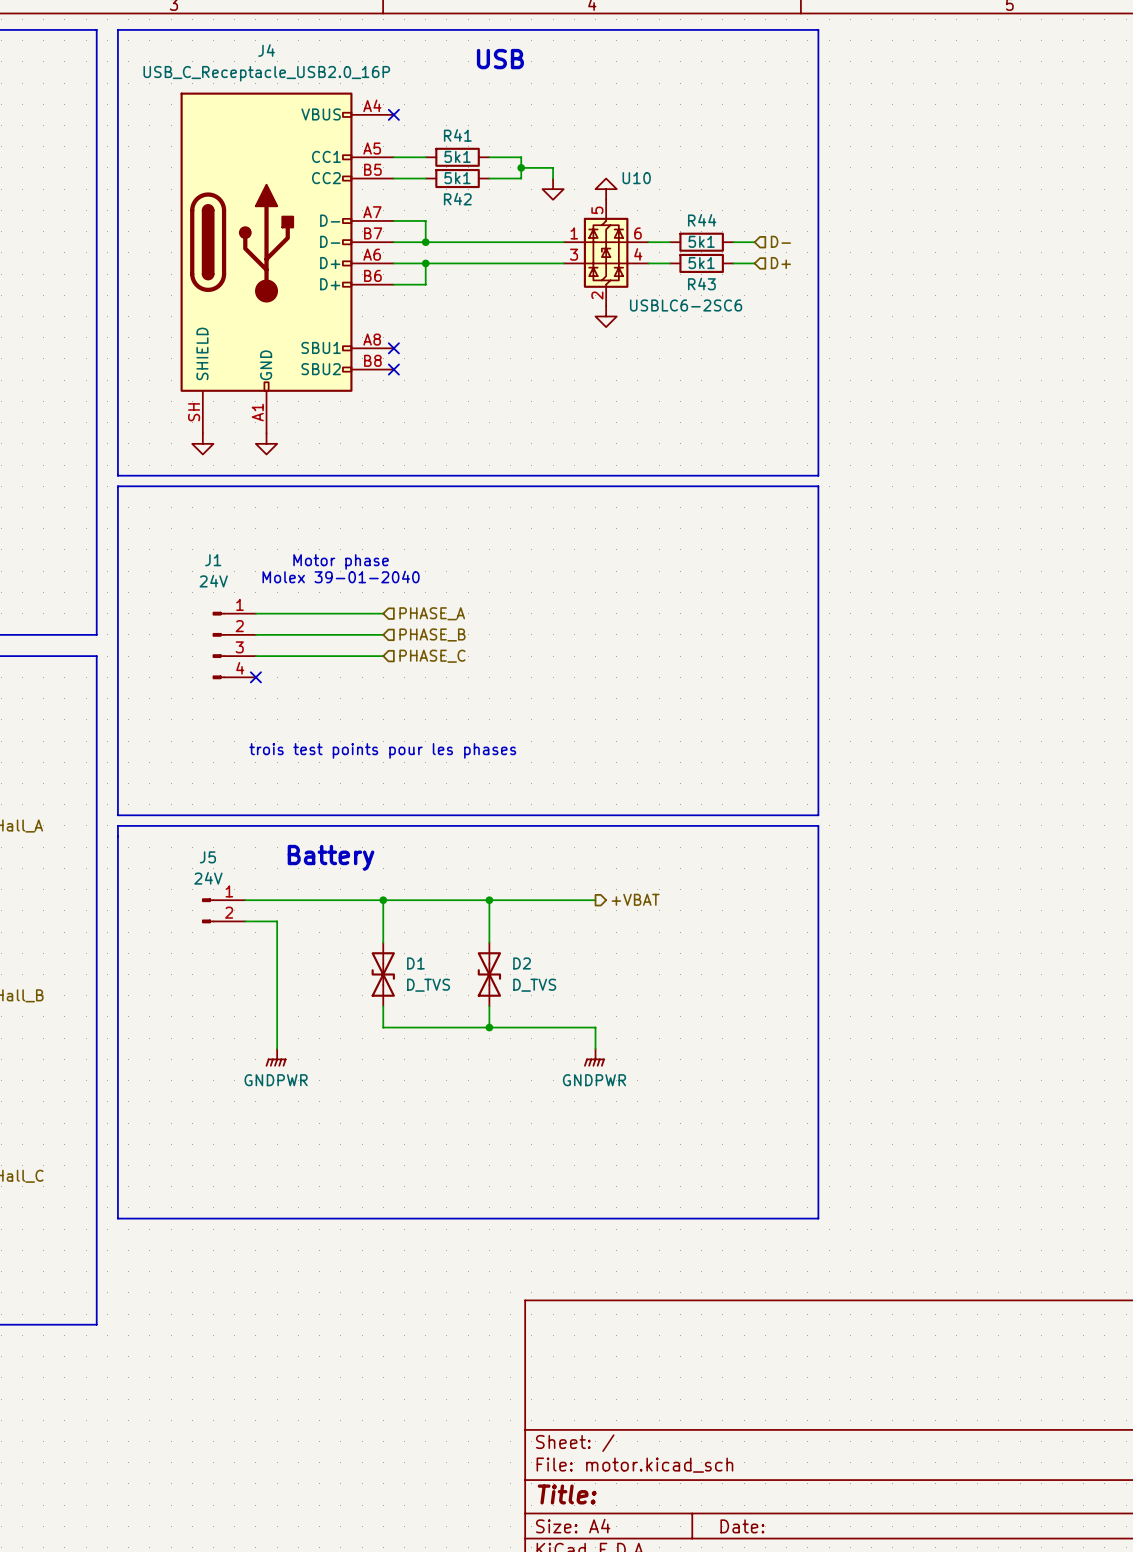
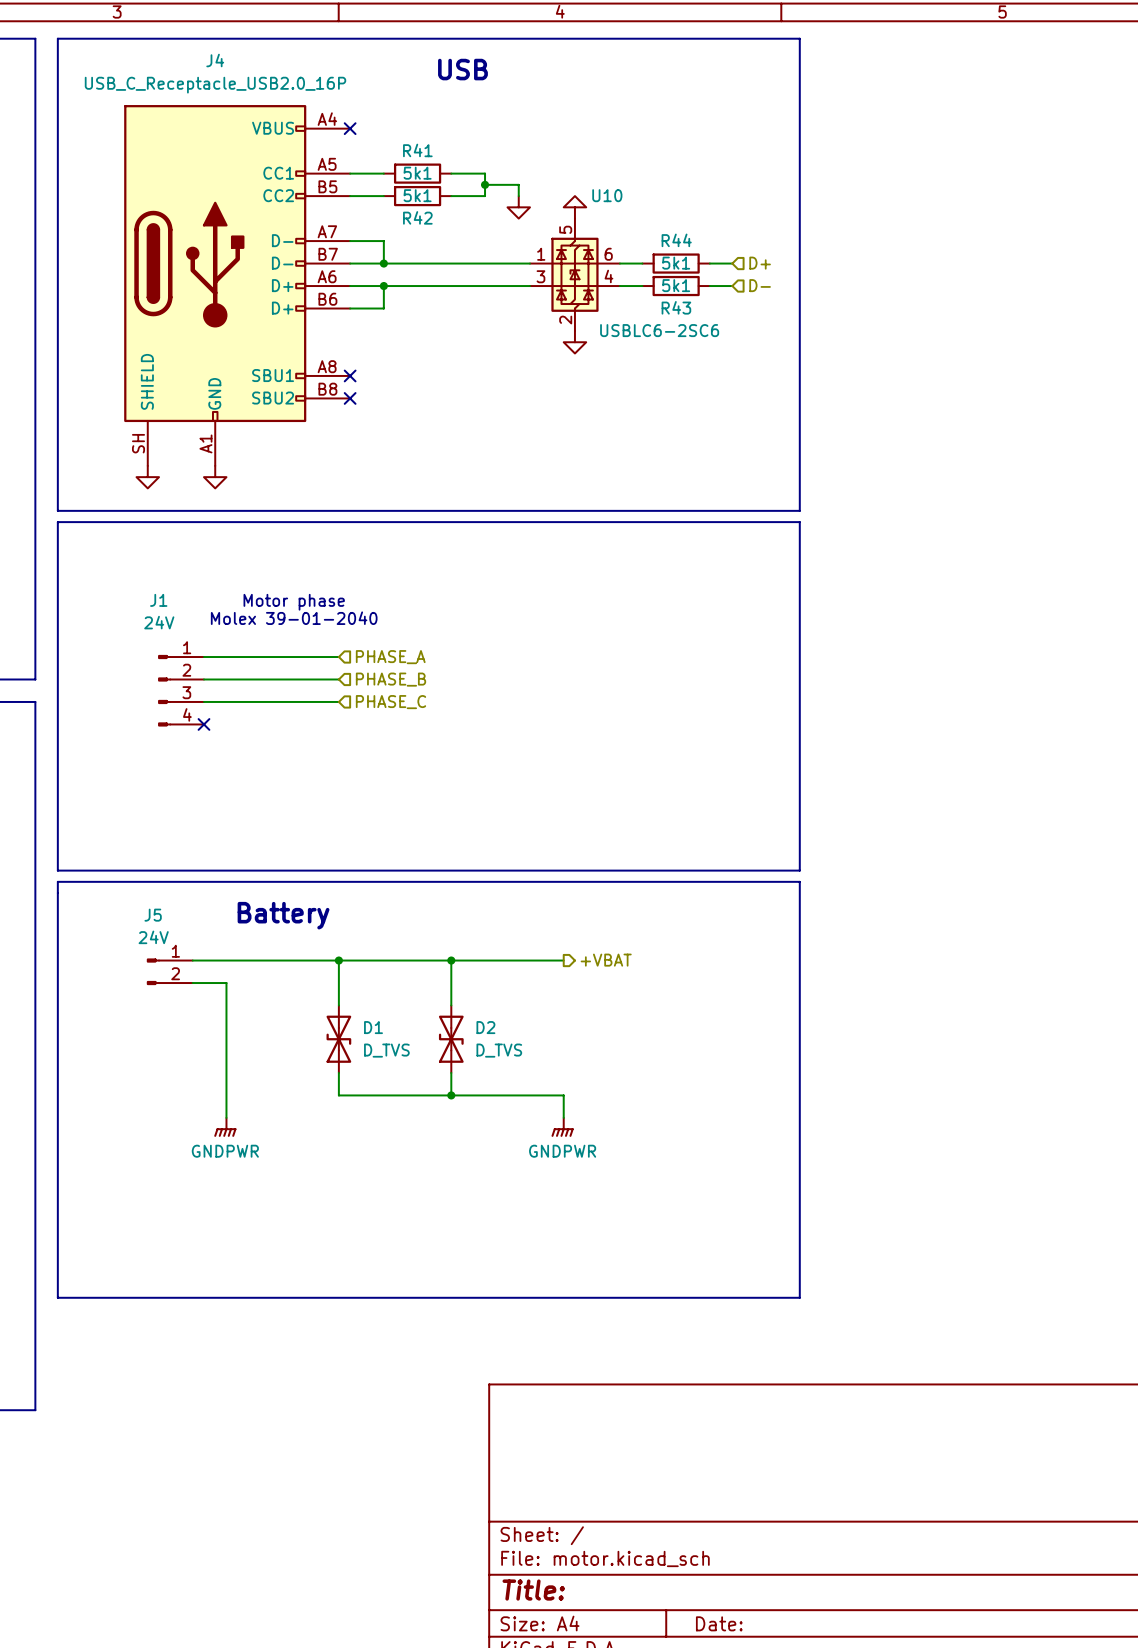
hierarchical label: D- (780, 241) -> D+ (760, 263)
hierarchical label: D+ (780, 263) -> D- (760, 285)
text: trois test points pour les phases (382, 750) -> none

